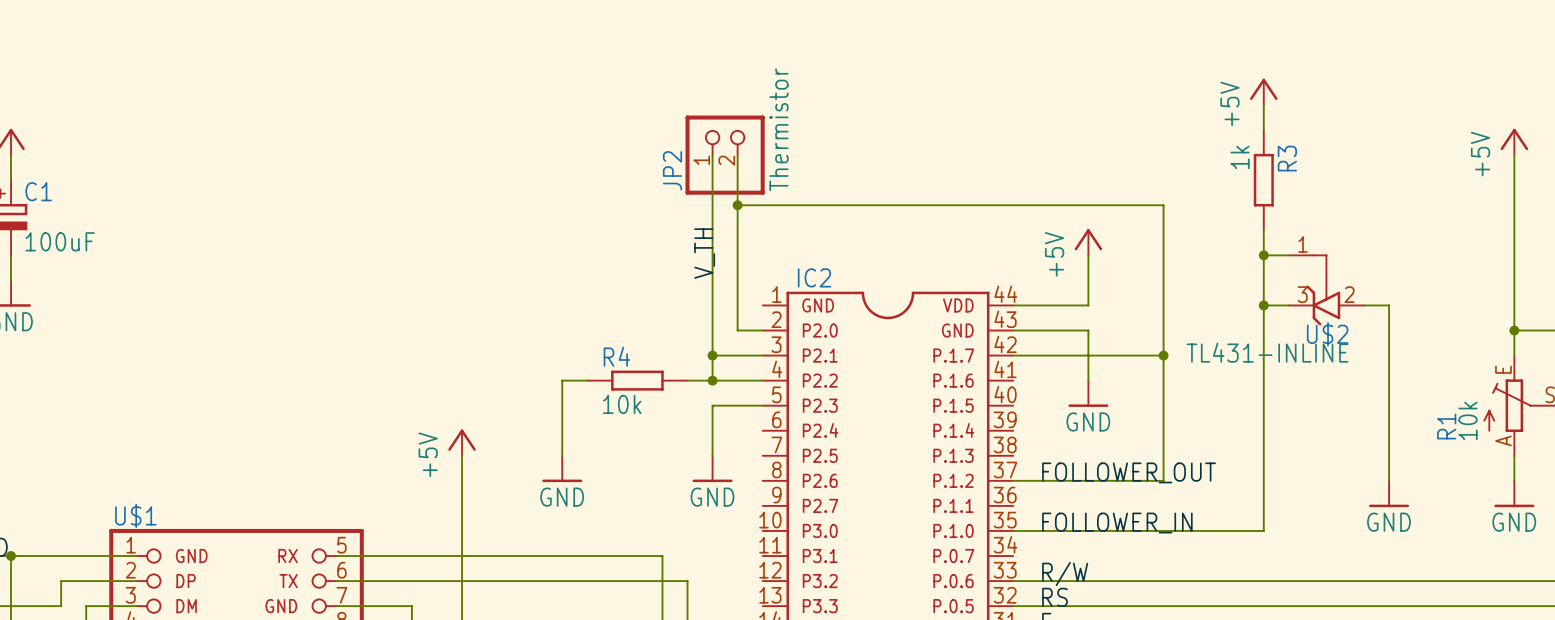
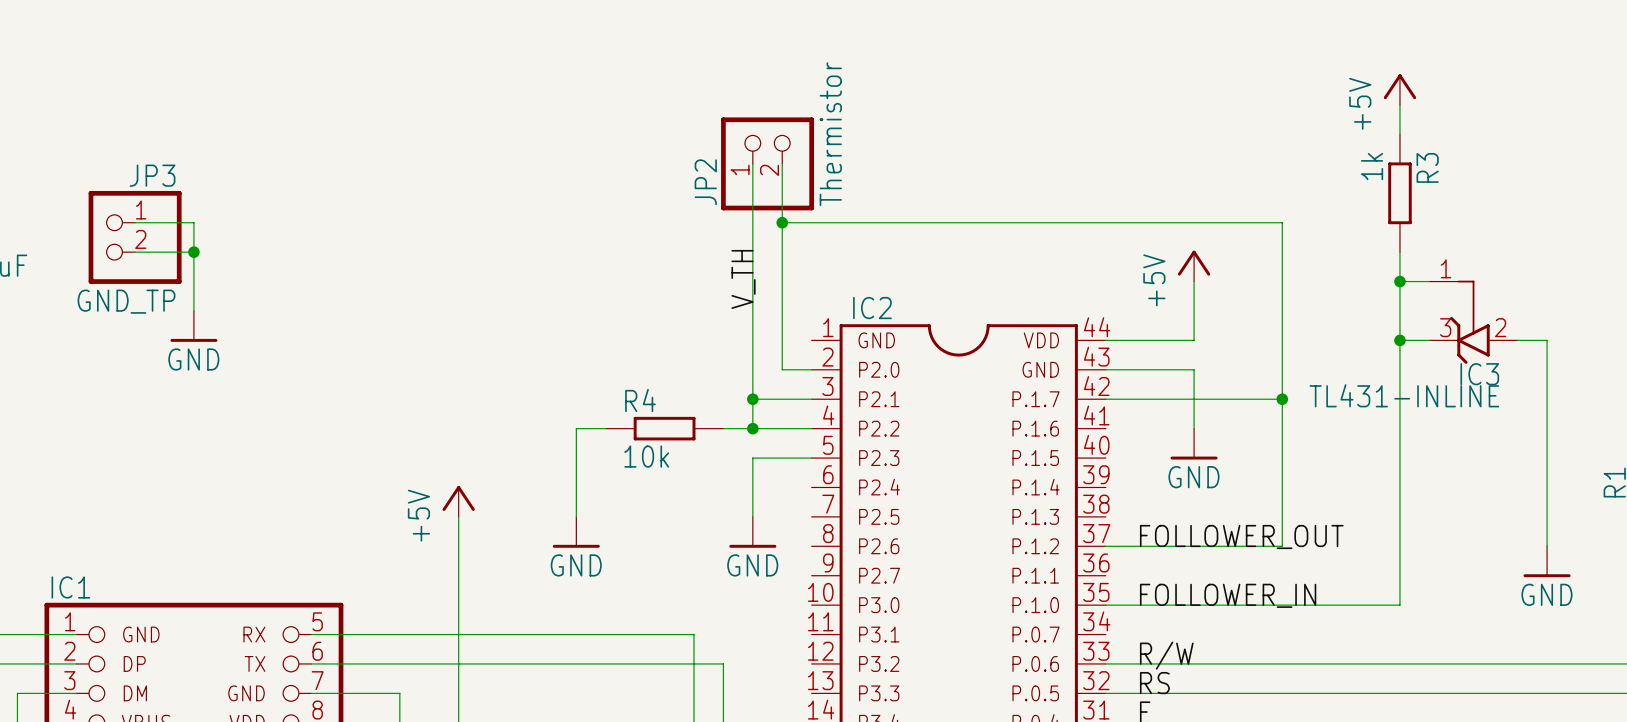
wire: none -> (135, 222) (193, 222) (193, 310)
JP3: none -> GND_TP (135, 237)
wire: none -> (135, 252) (193, 252)
junction: none -> (193, 252)
power symbol: none -> GND (193, 326)
U$2 name: U$2 (1327, 334) -> IC3 (1479, 374)
U$1 name: U$1 (135, 515) -> IC1 (70, 587)

